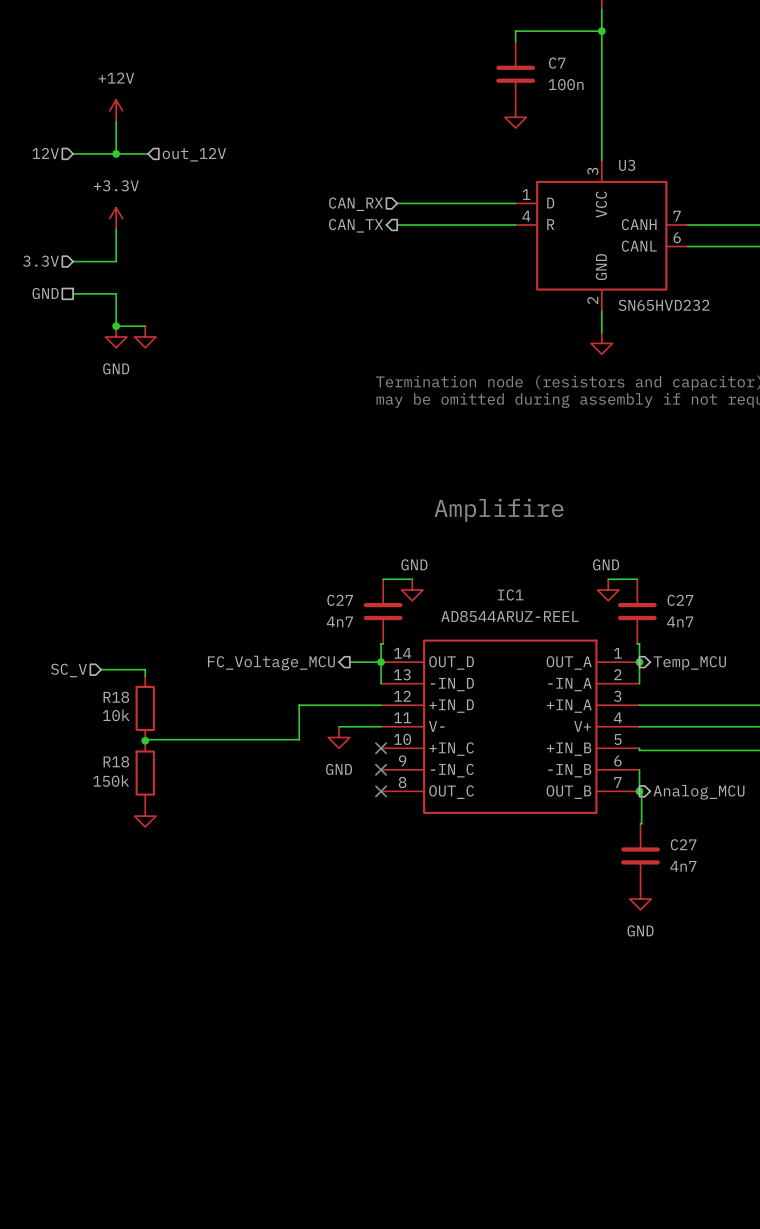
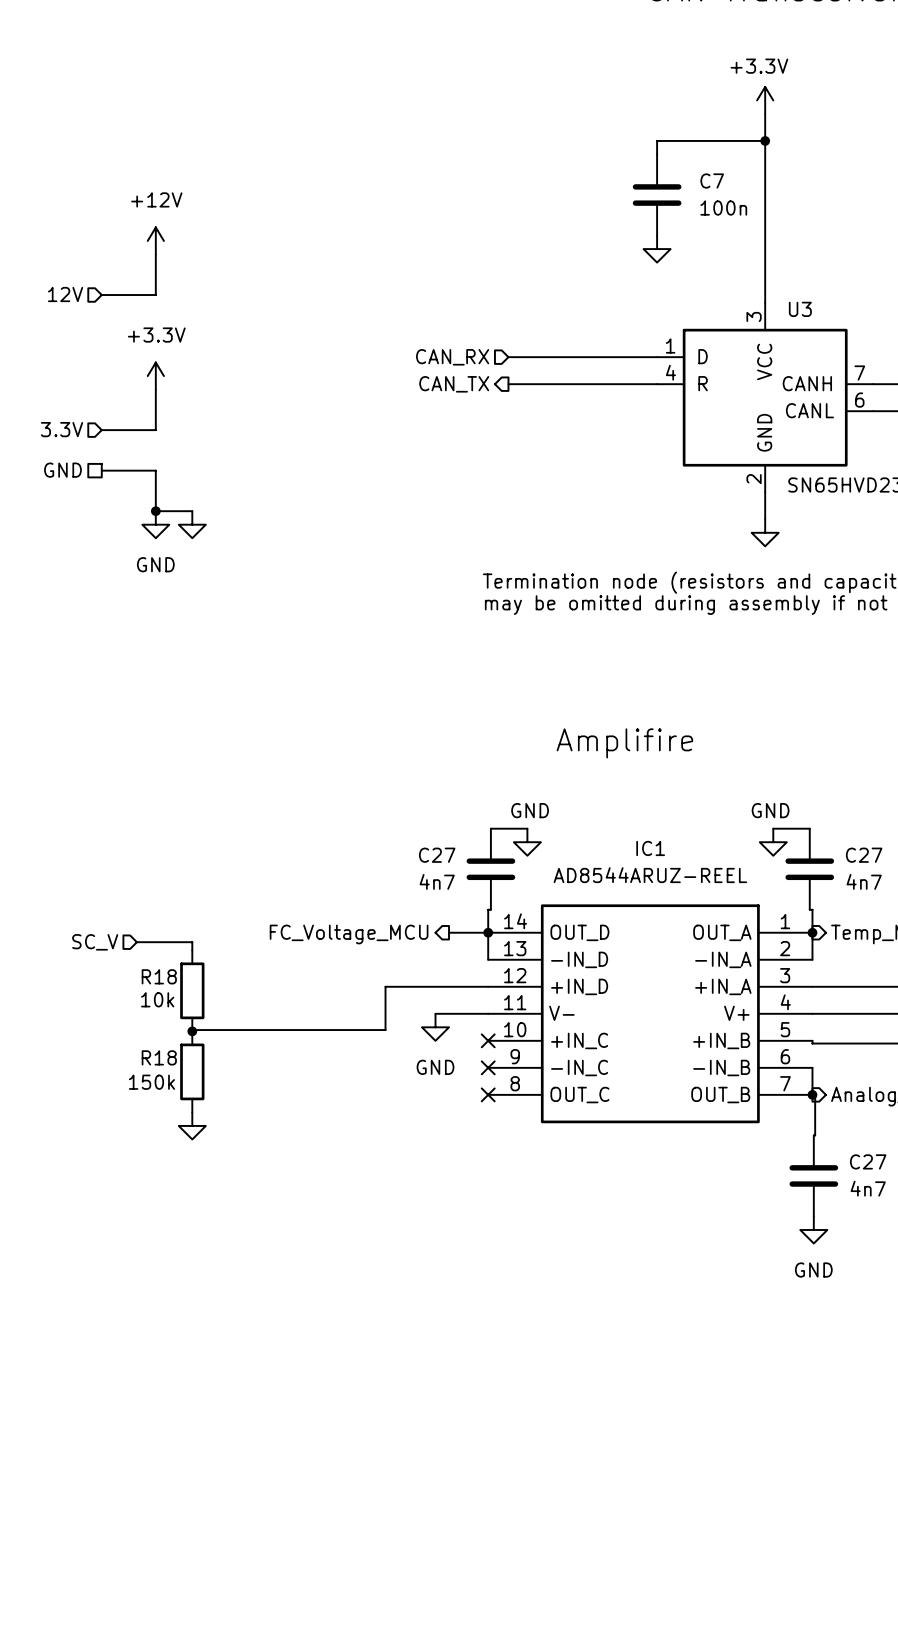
wire: (116, 153) (148, 153) -> none
junction: (116, 153) -> none
hierarchical label: out_12V (194, 154) -> none

